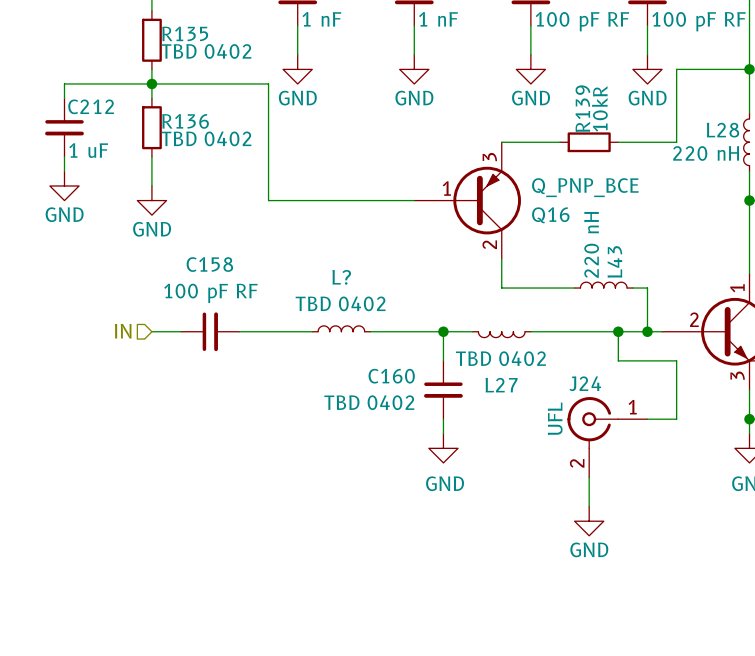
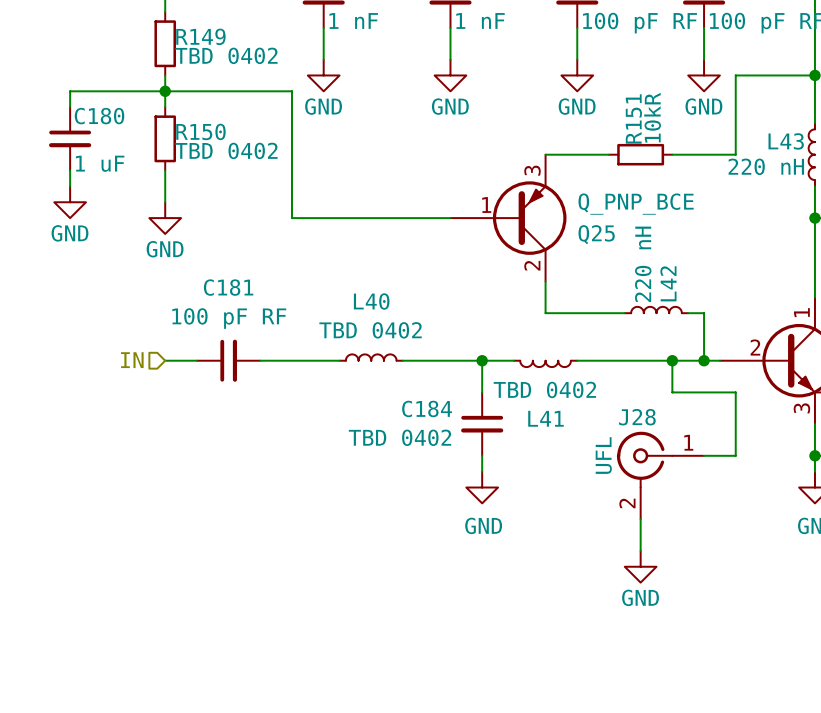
R135 name: R135 (185, 33) -> R149 (200, 36)
C212 name: C212 (91, 106) -> C180 (99, 116)
R139 name: R139 (582, 108) -> R151 (633, 119)
R136 name: R136 (185, 121) -> R150 (200, 131)
L28 name: L28 (722, 130) -> L43 (786, 141)
Q16 name: Q16 (550, 215) -> Q25 (596, 234)
L43 name: L43 (614, 261) -> L42 (668, 283)
C158 name: C158 (209, 264) -> C181 (228, 287)
L? name: L? (341, 277) -> L40 (371, 301)
C160 name: C160 (391, 376) -> C184 (427, 408)
J24 name: J24 (585, 383) -> J28 (637, 417)
L27 name: L27 (501, 385) -> L41 (545, 418)

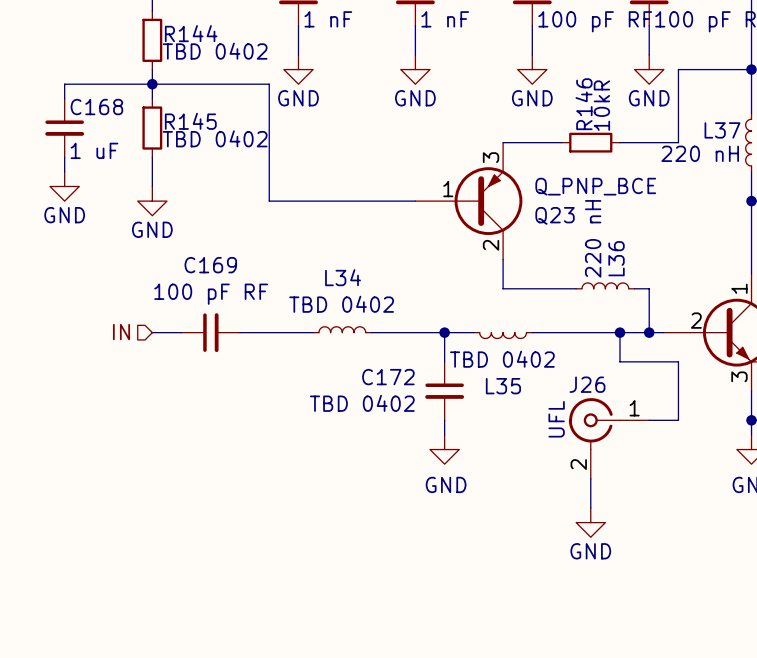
R149 name: R149 (200, 36) -> R144 (191, 33)
C180 name: C180 (99, 116) -> C168 (96, 107)
R151 name: R151 (633, 119) -> R146 (584, 104)
R150 name: R150 (200, 131) -> R145 (190, 121)
L43 name: L43 (786, 141) -> L37 (722, 130)
Q25 name: Q25 (596, 234) -> Q23 (555, 215)
L42 name: L42 (668, 283) -> L36 (616, 258)
C181 name: C181 (228, 287) -> C169 (210, 265)
L40 name: L40 (371, 301) -> L34 (343, 277)
C184 name: C184 (427, 408) -> C172 (388, 377)
J28 name: J28 (637, 417) -> J26 (587, 384)
L41 name: L41 (545, 418) -> L35 (503, 386)

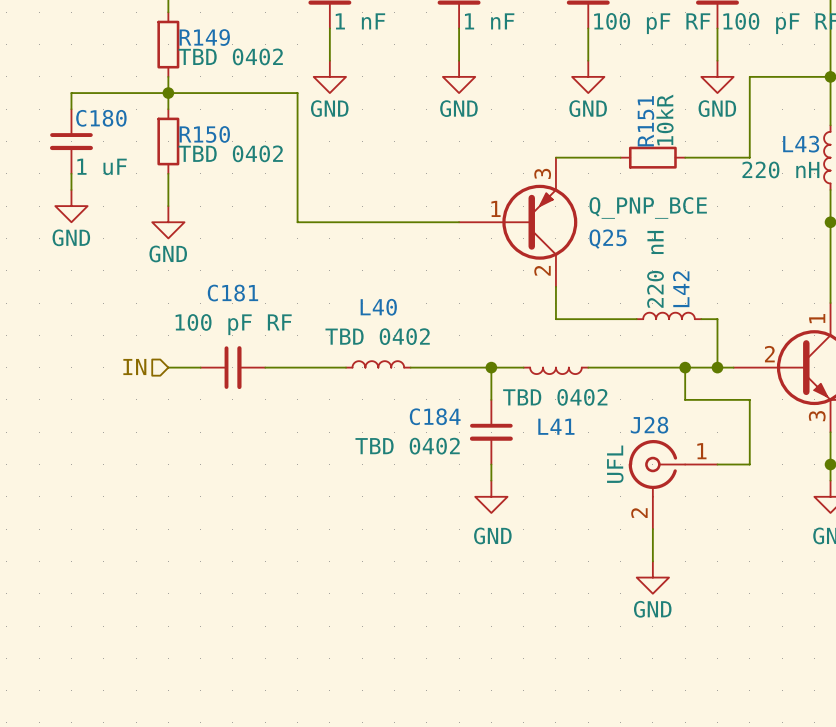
R144 name: R144 (191, 33) -> R149 (204, 37)
R146 name: R146 (584, 104) -> R151 (645, 121)
C168 name: C168 (96, 107) -> C180 (101, 118)
R145 name: R145 (190, 121) -> R150 (204, 134)
L37 name: L37 (722, 130) -> L43 (801, 144)
Q23 name: Q23 (555, 215) -> Q25 (608, 239)
L36 name: L36 (616, 258) -> L42 (681, 289)
C169 name: C169 (210, 265) -> C181 (232, 293)
L34 name: L34 (343, 277) -> L40 (378, 307)
C172 name: C172 (388, 377) -> C184 (435, 416)
J26 name: J26 (587, 384) -> J28 (649, 425)
L35 name: L35 (503, 386) -> L41 (556, 426)

